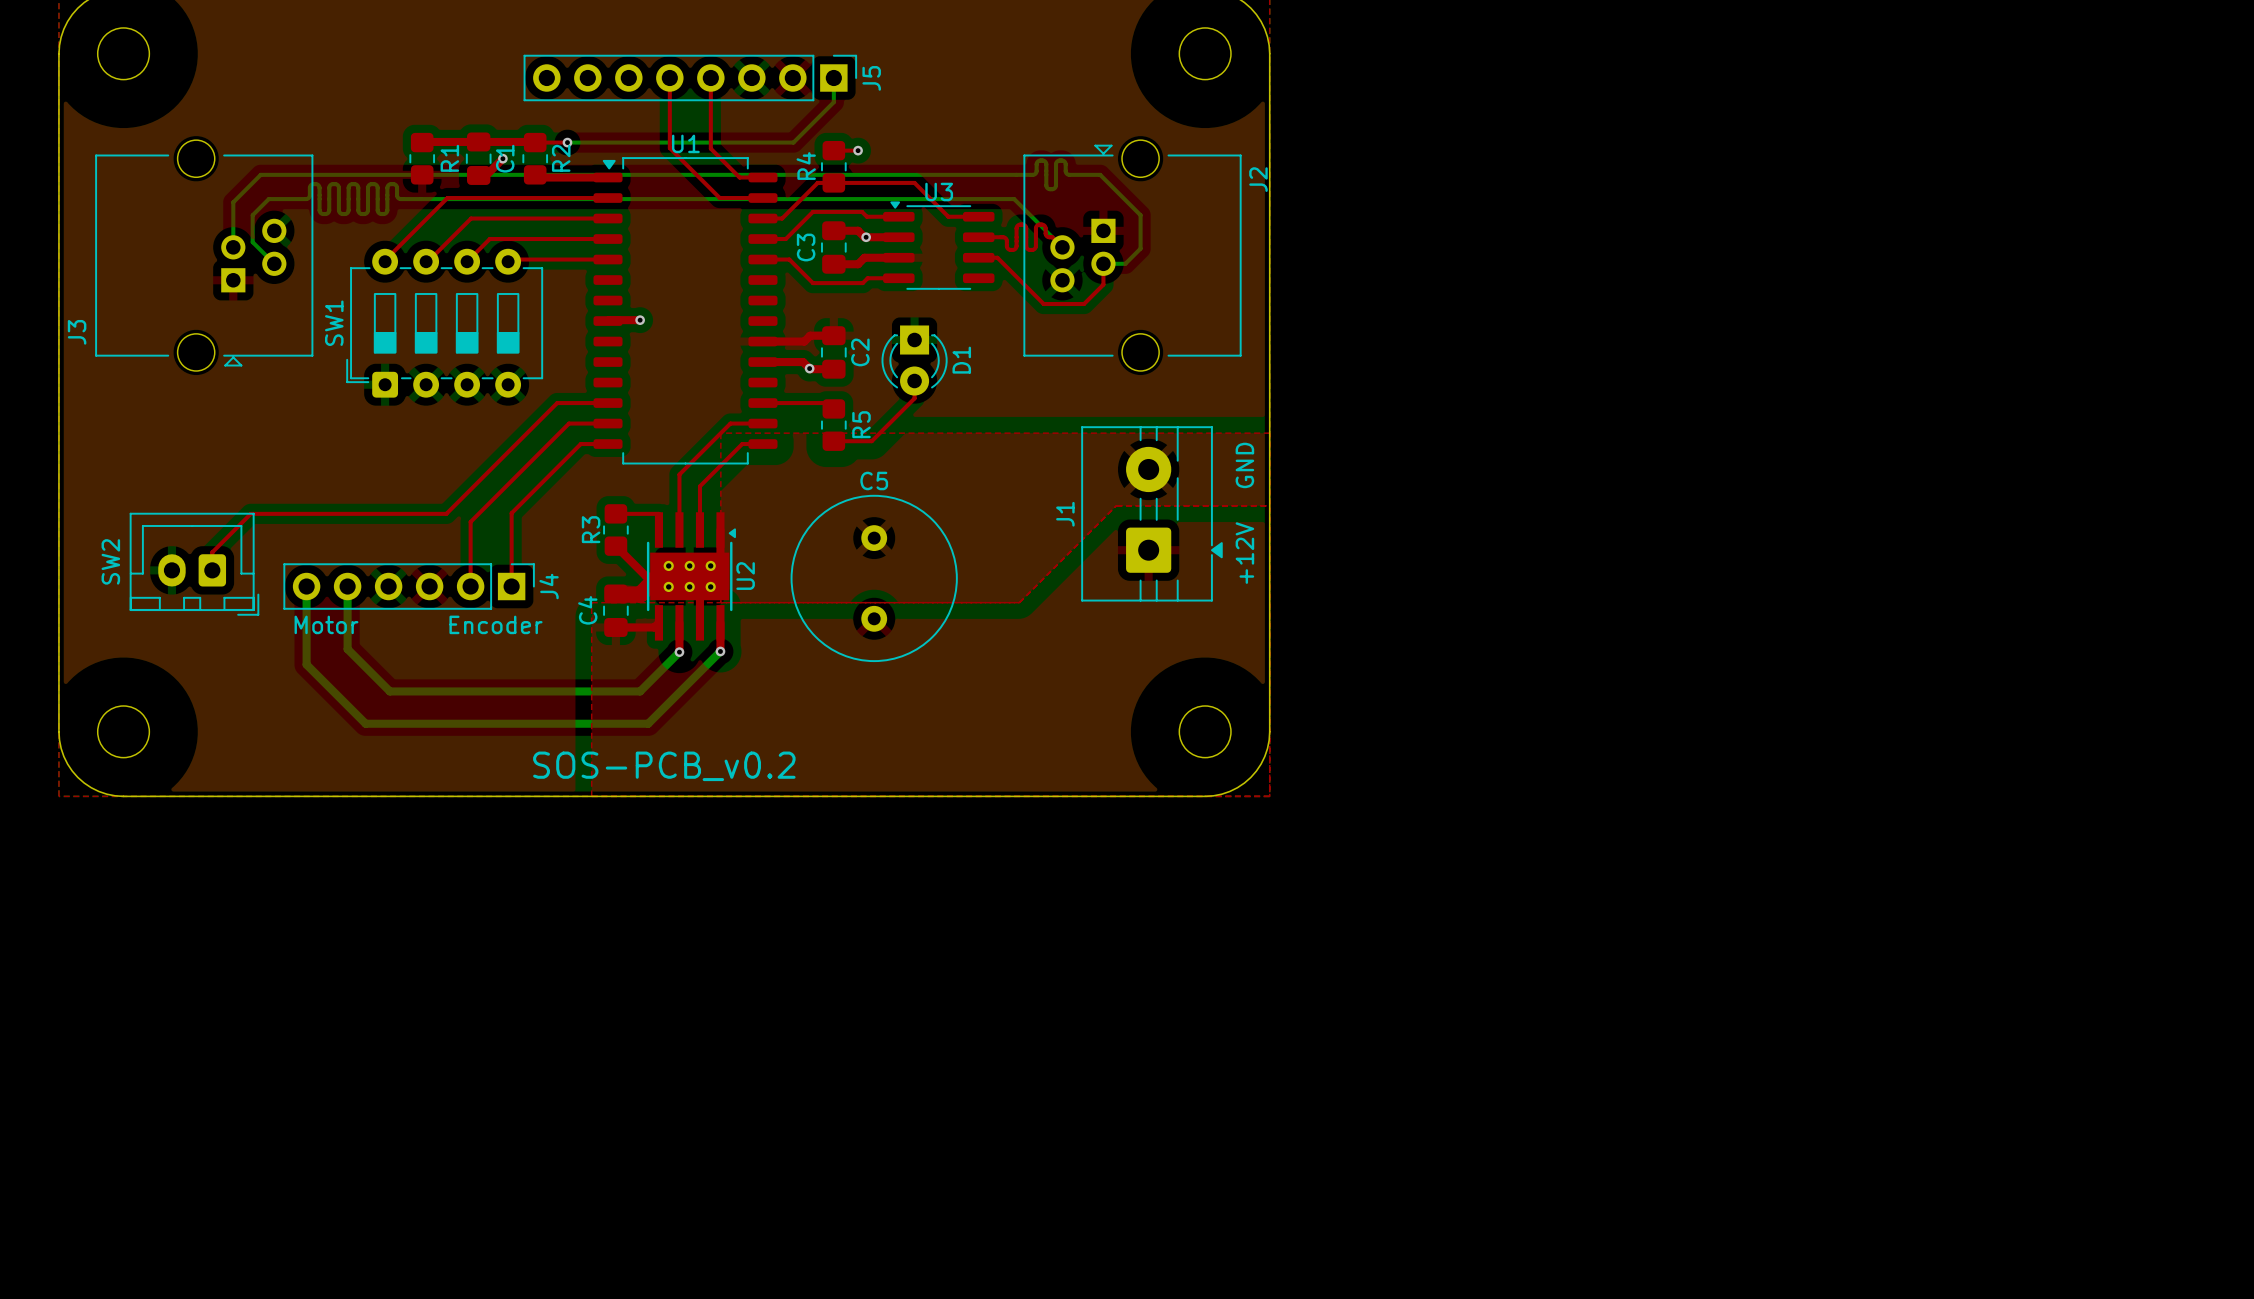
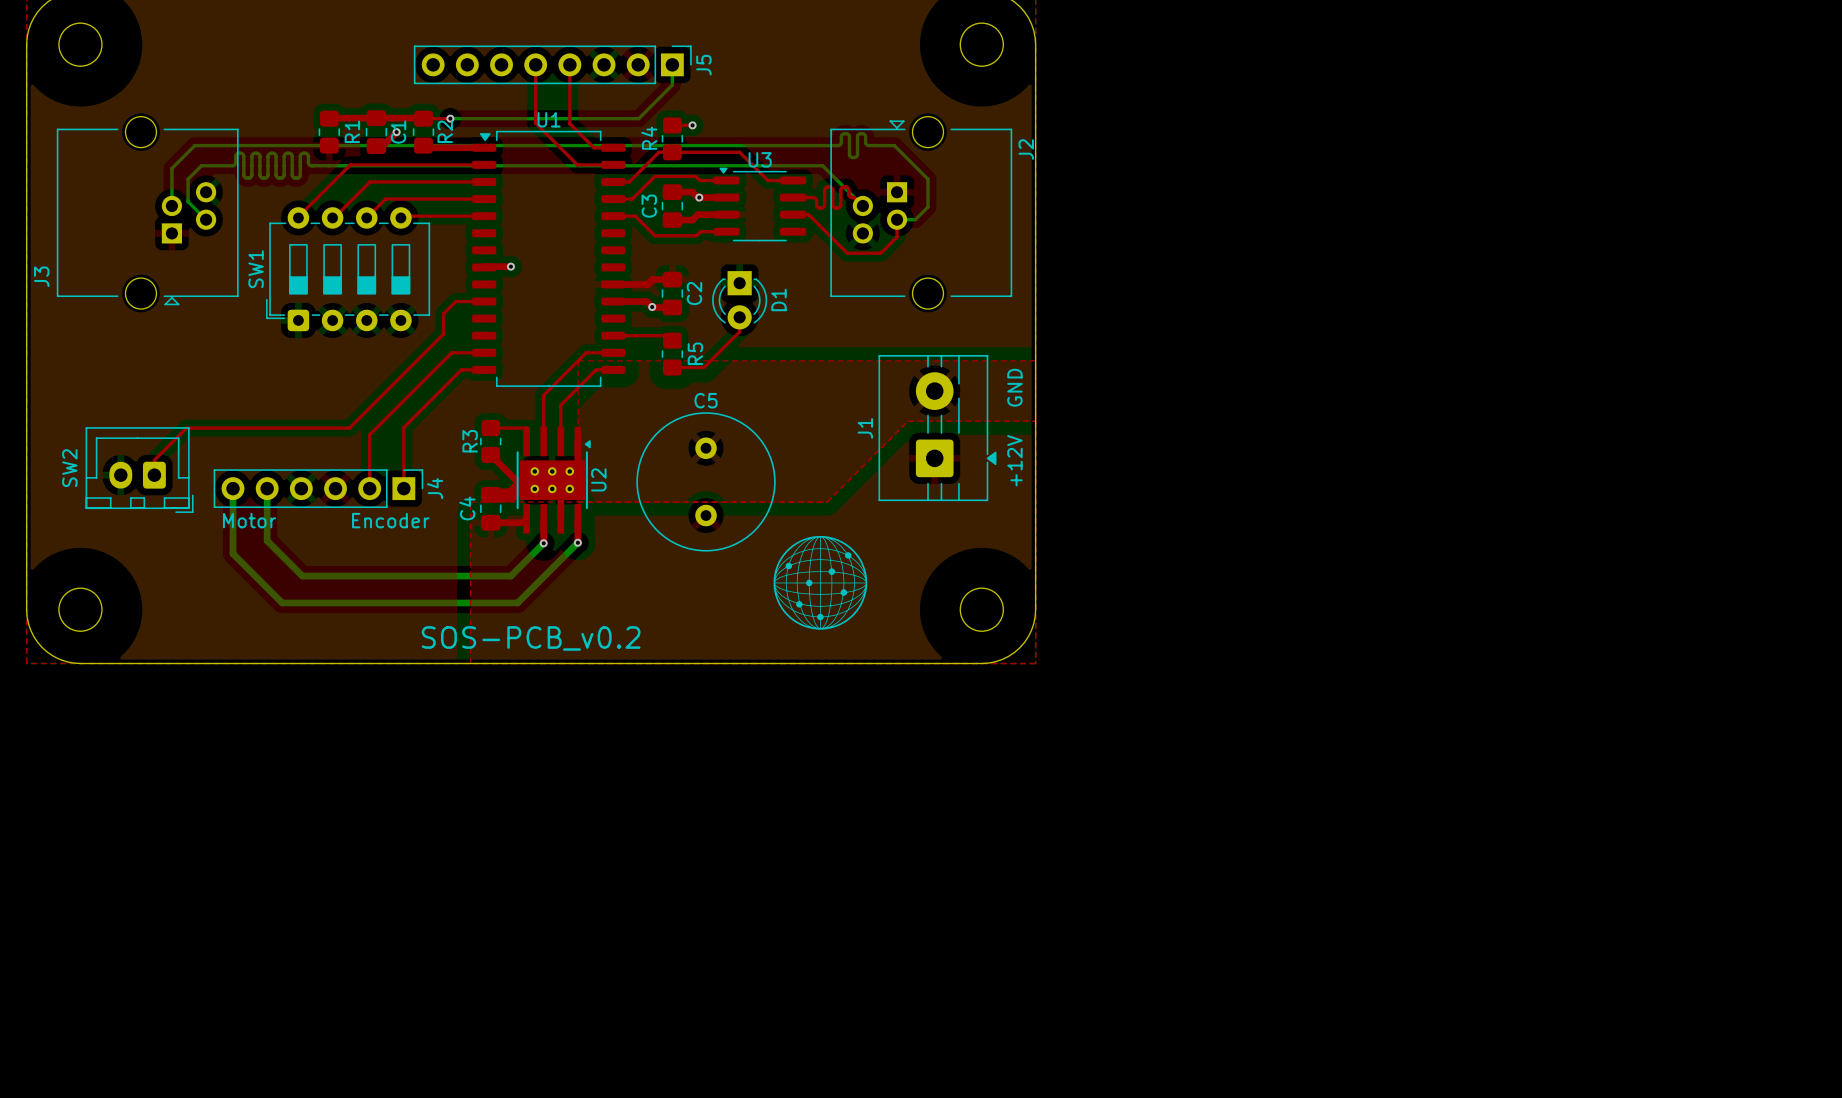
top track: (557, 403) (608, 403) -> (441, 335) (443, 333) (443, 313) (455, 301) (484, 301)
drawing: none -> [773, 536, 868, 630]

